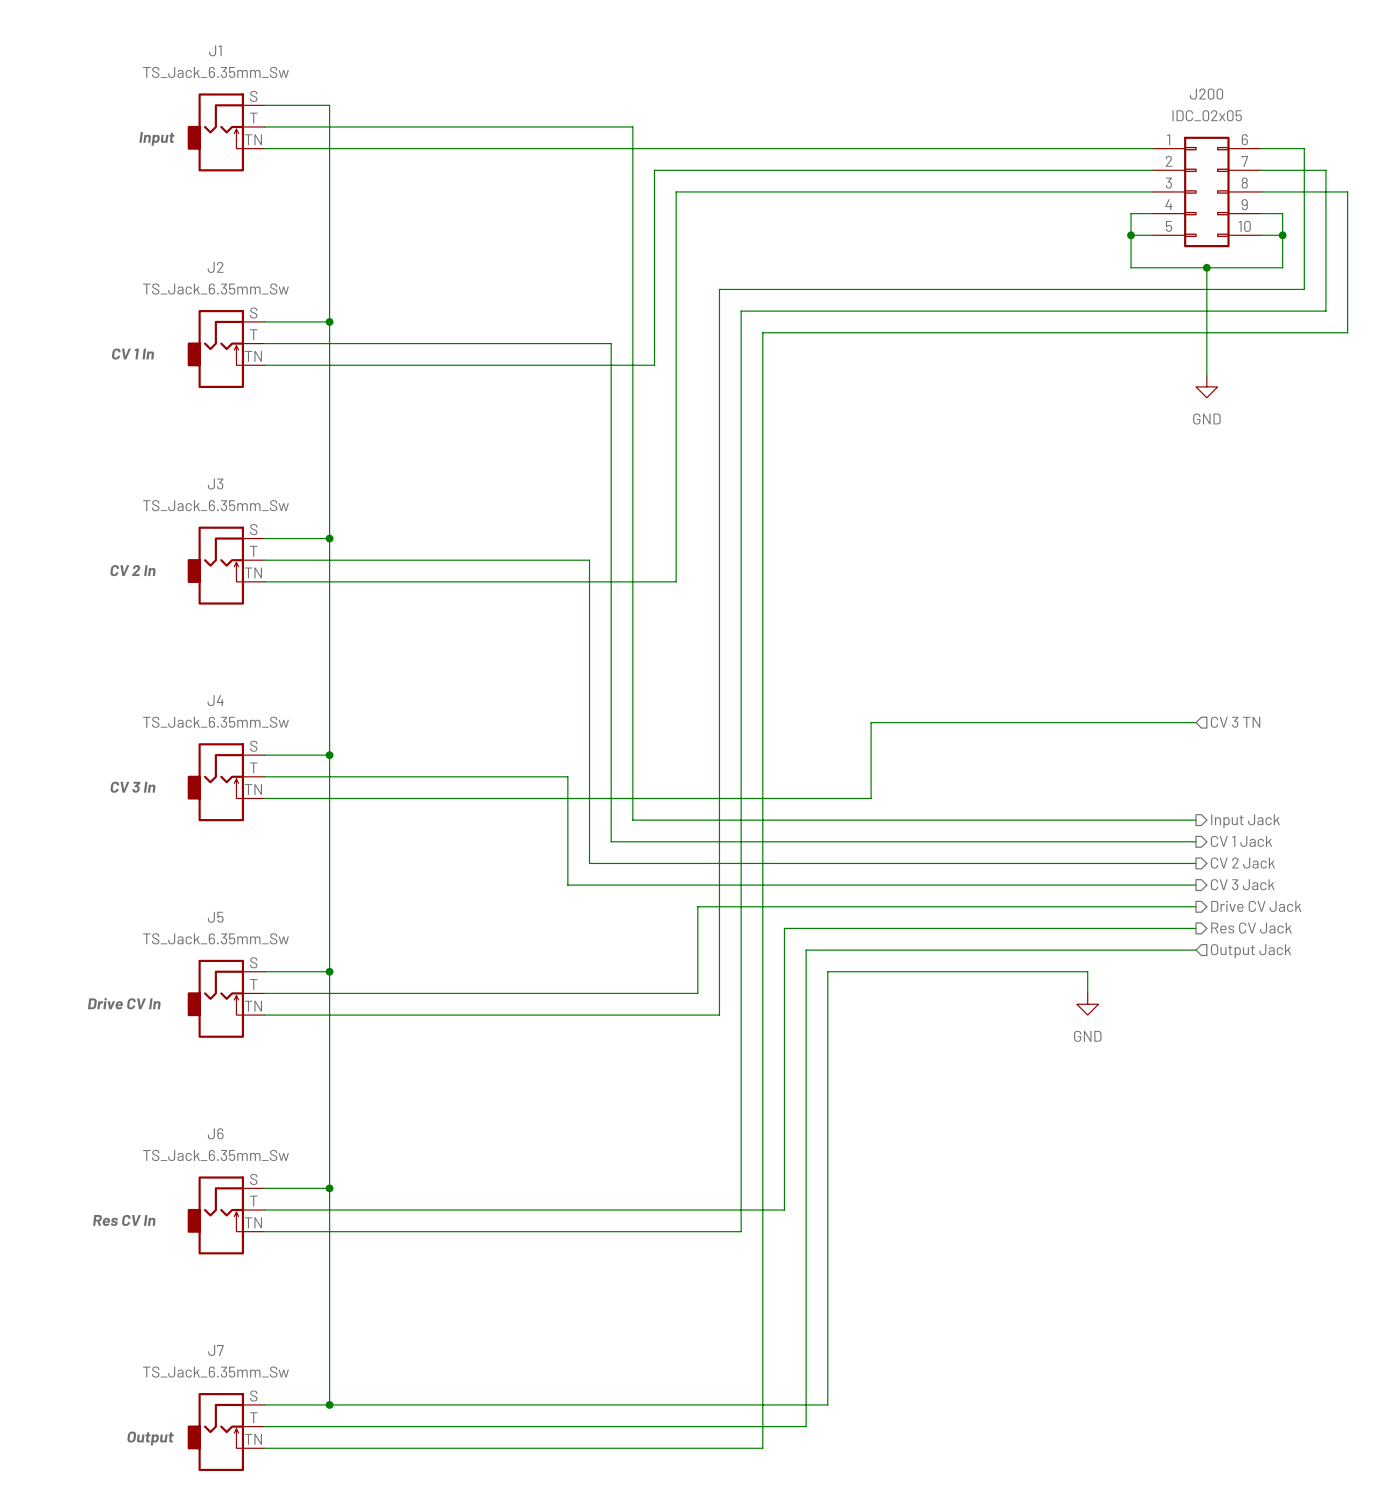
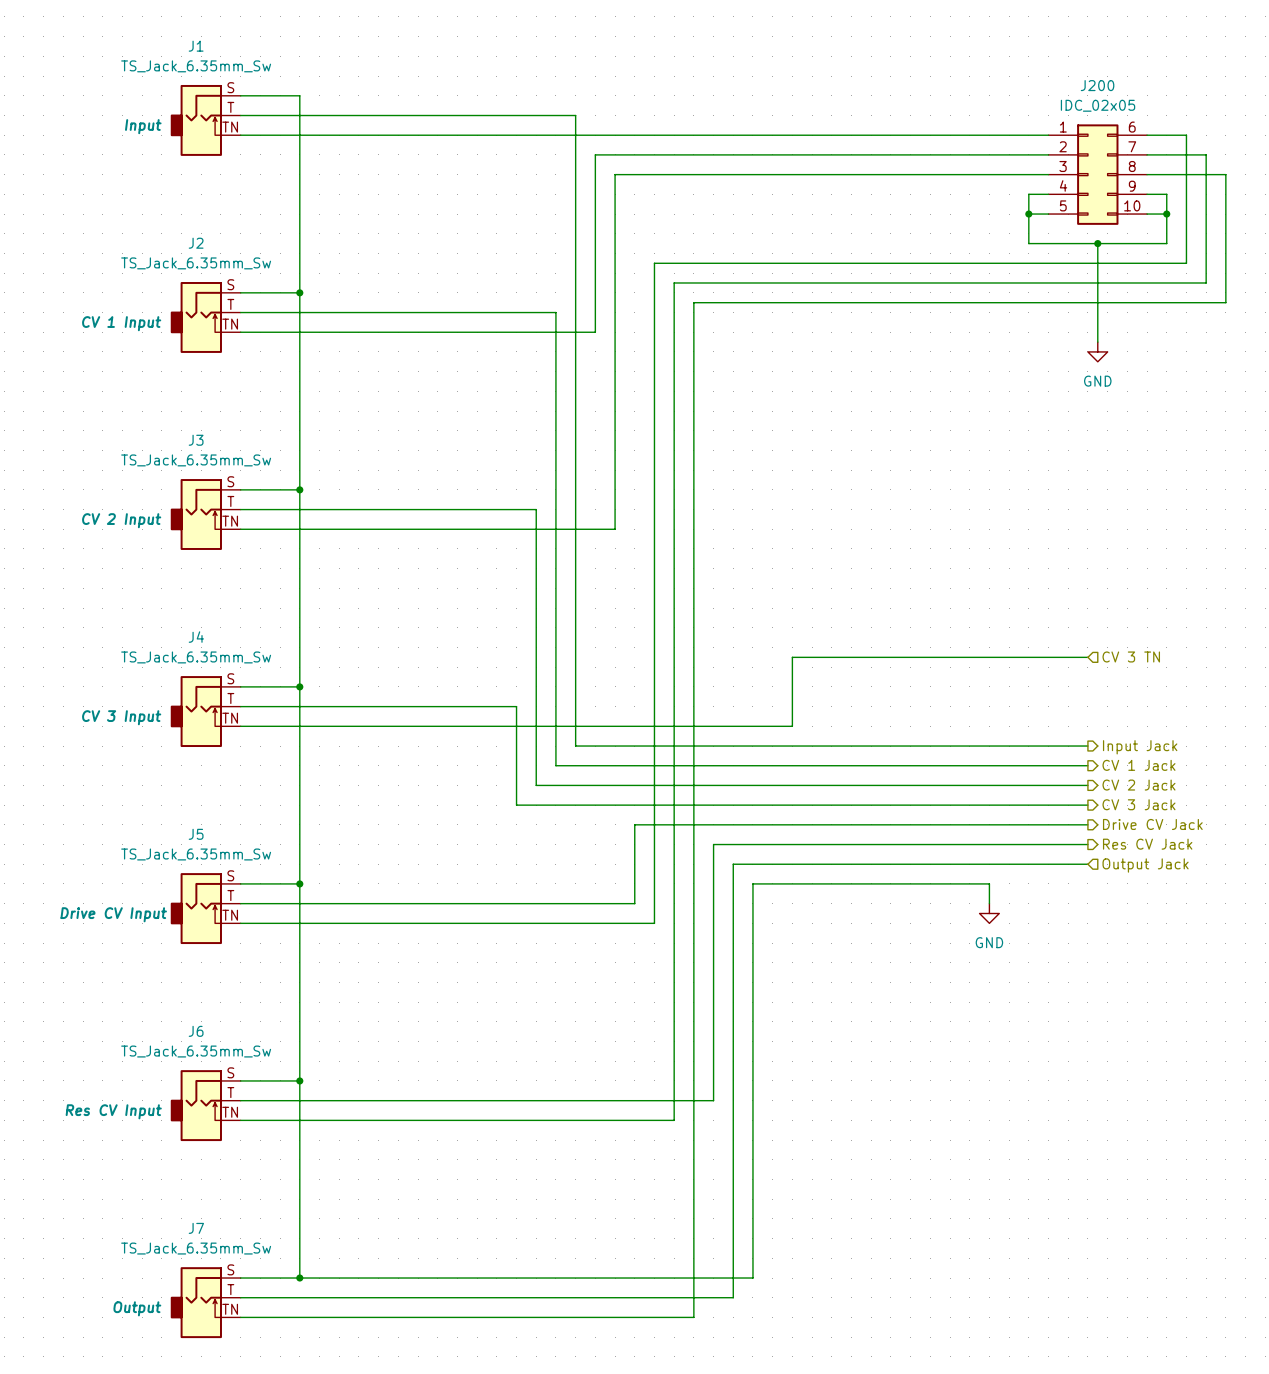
J2 text: CV 1 In (133, 354) -> CV 1 Input (121, 323)
J3 text: CV 2 In (133, 570) -> CV 2 Input (121, 520)
J4 text: CV 3 In (133, 787) -> CV 3 Input (121, 717)
J5 text: Drive CV In (124, 1003) -> Drive CV Input (113, 914)
J6 text: Res CV In (124, 1220) -> Res CV Input (113, 1111)

